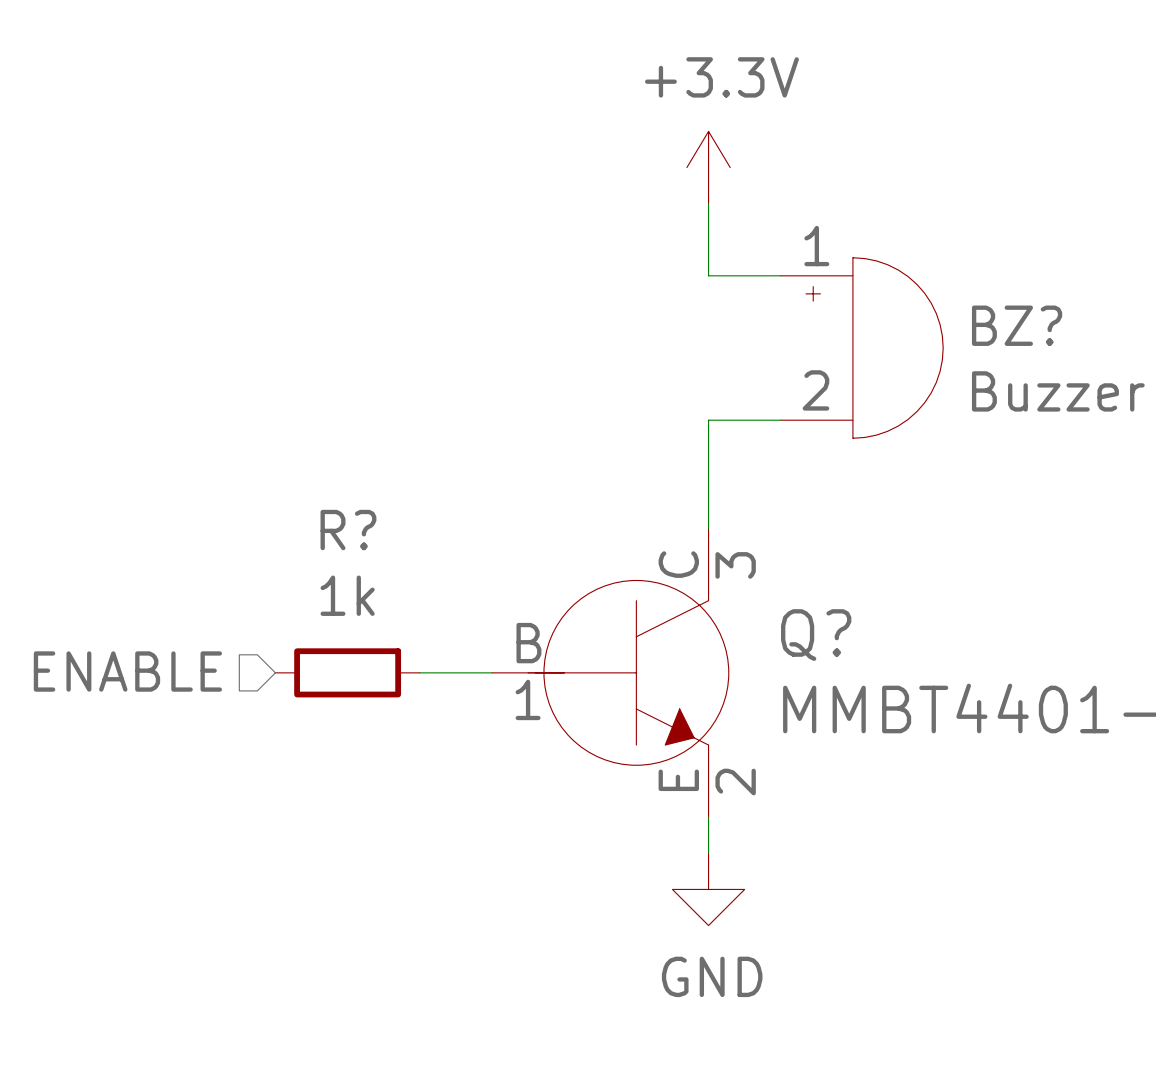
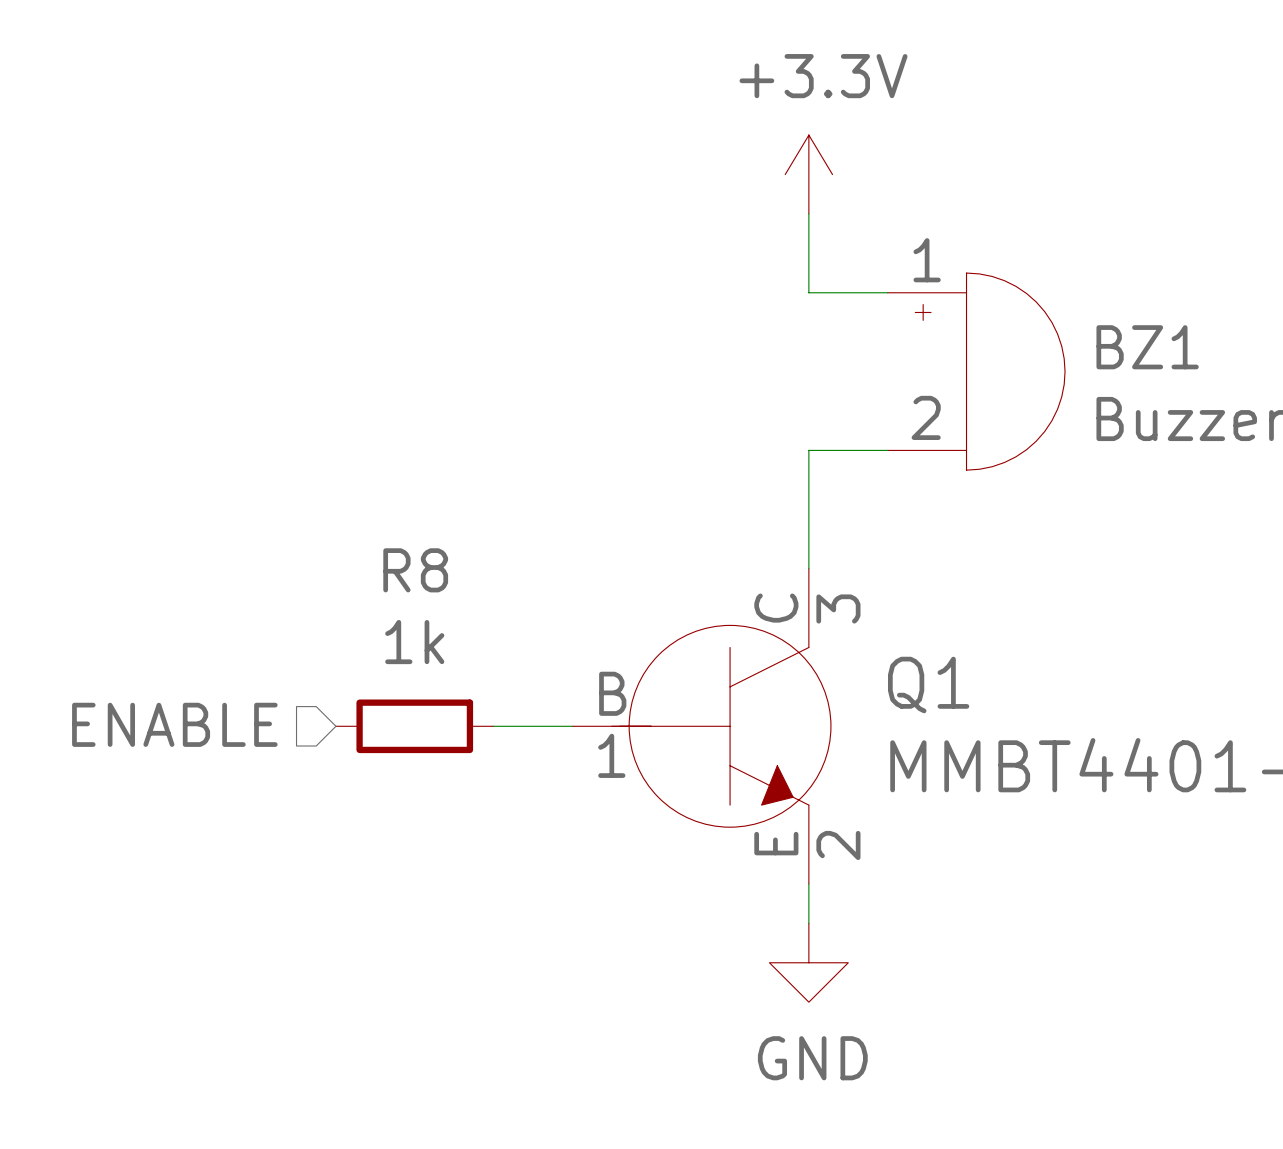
BZ? name: BZ? (1017, 325) -> BZ1 (1147, 347)
R? name: R? (348, 530) -> R8 (415, 570)
Q? name: Q? (816, 635) -> Q1 (928, 685)

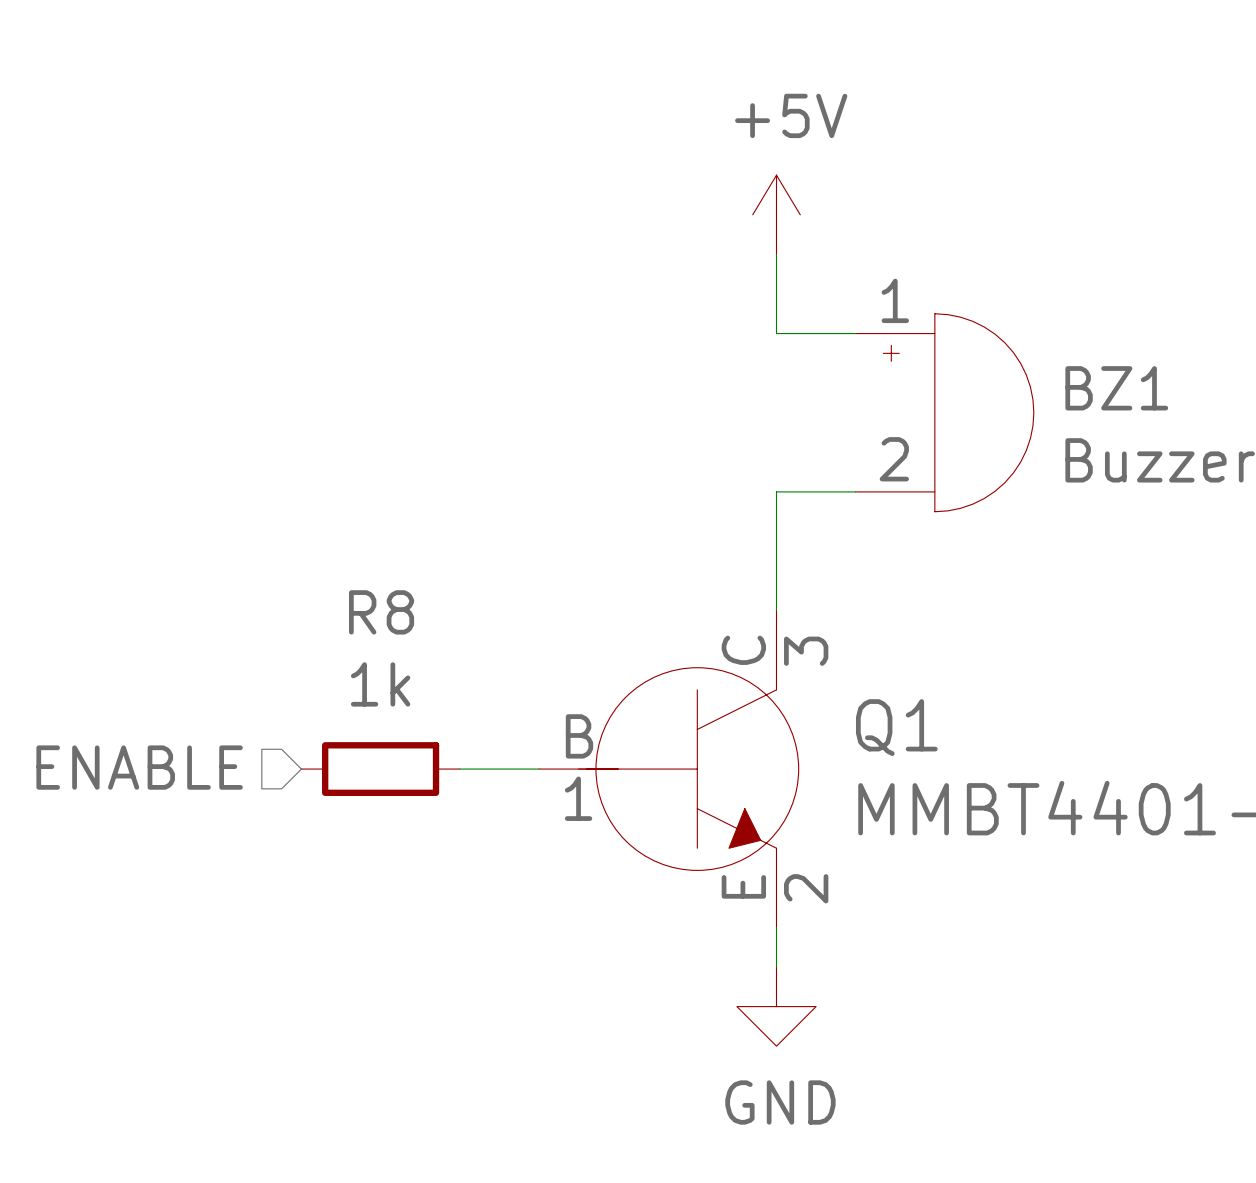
power symbol: +3.3V (808, 174) -> +5V (776, 214)

